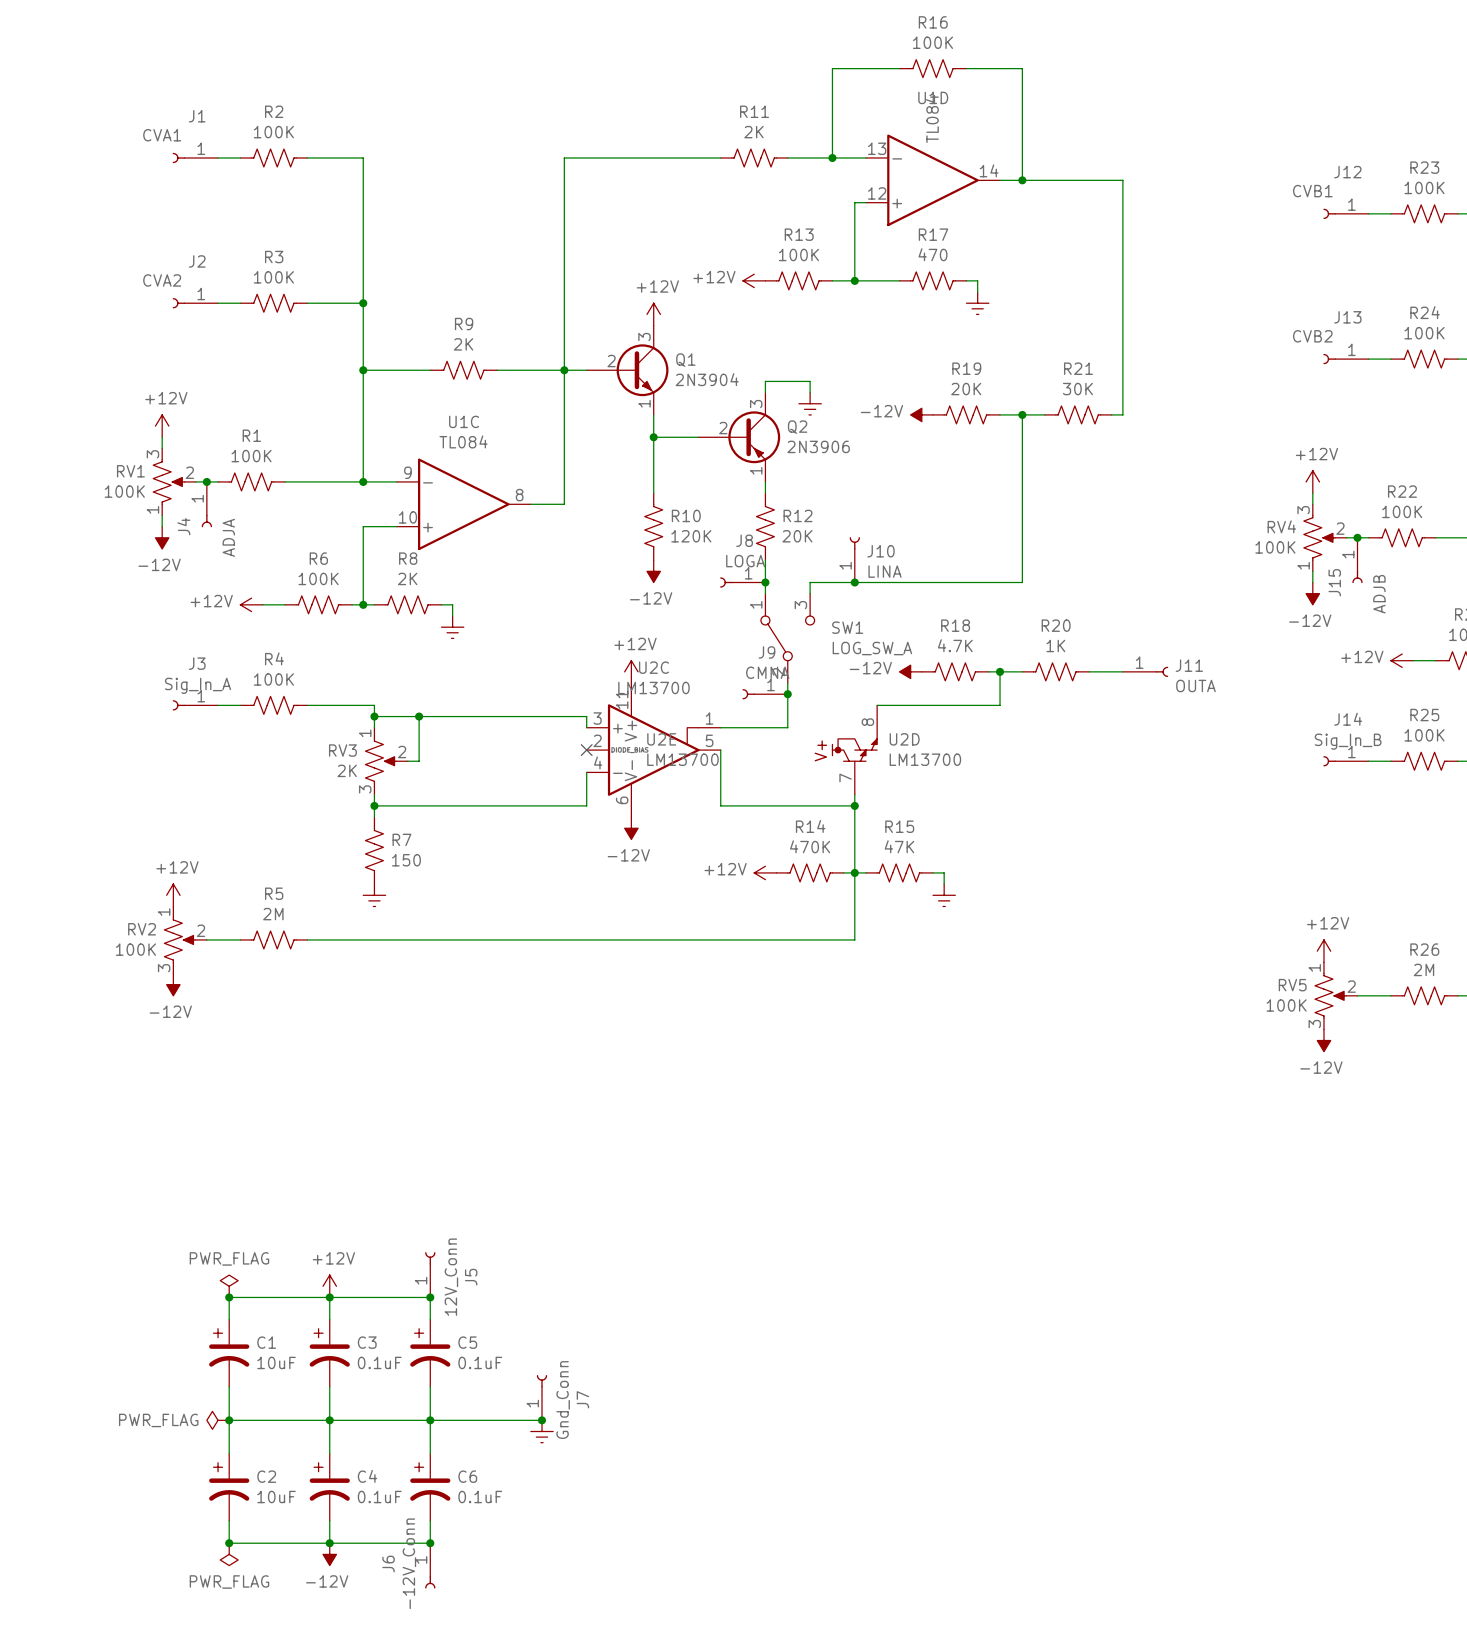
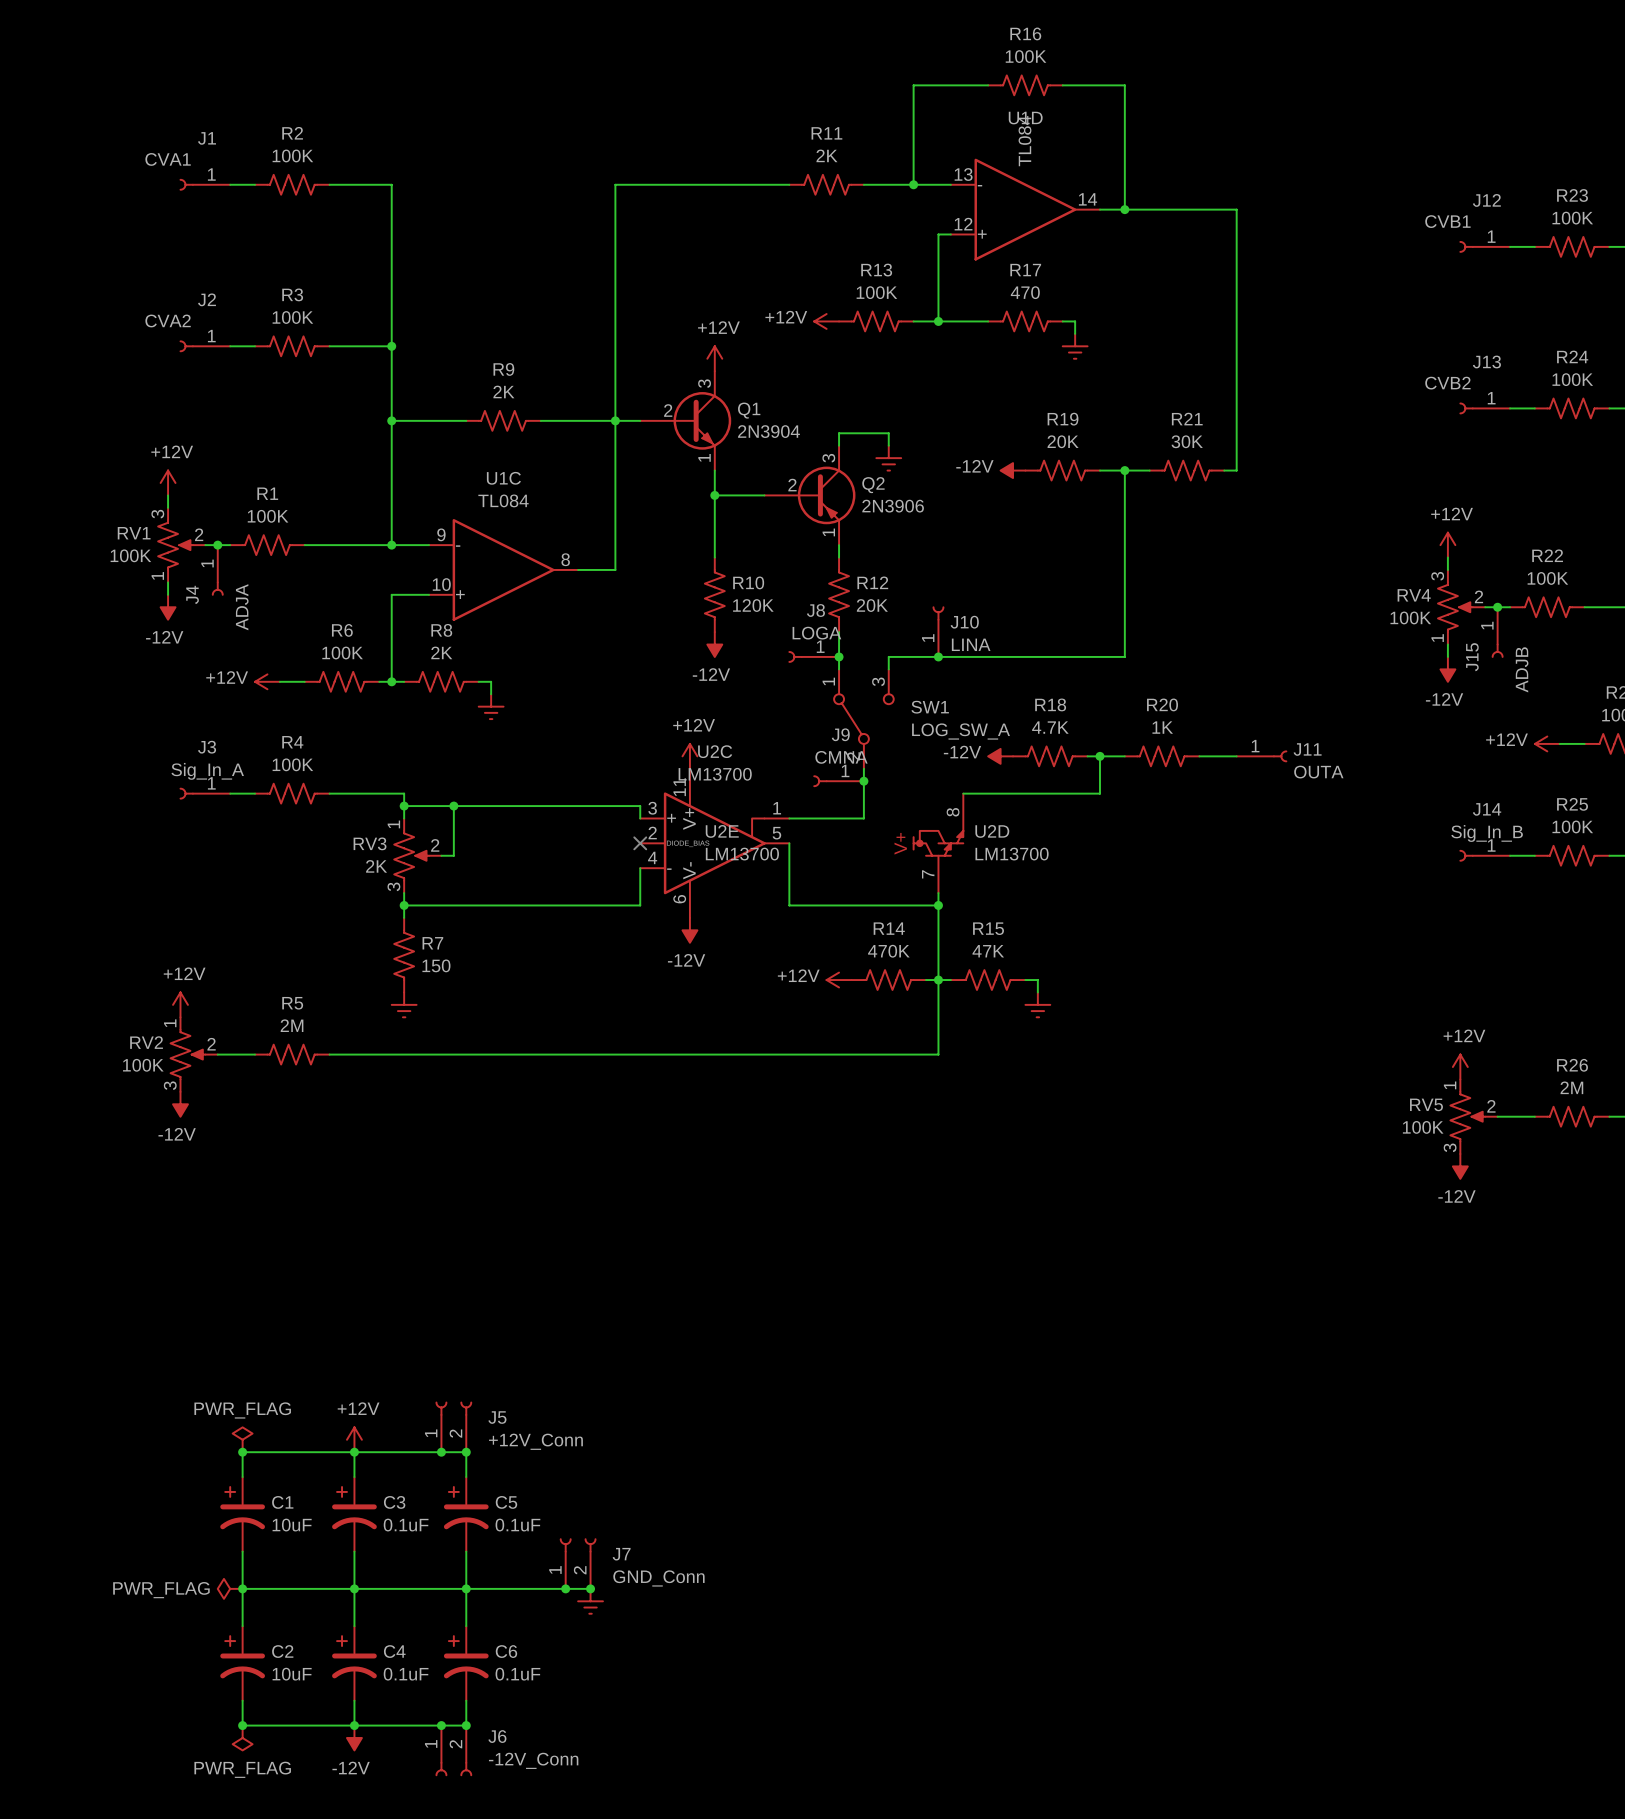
J5 symbol: [425, 1252, 436, 1298] -> [435, 1401, 473, 1453]
J5 value: 12V_Conn (451, 1277) -> +12V_Conn (535, 1441)
junction: none -> (441, 1452)
J7 symbol: [536, 1374, 548, 1421] -> [559, 1538, 597, 1589]
J7 value: Gnd_Conn (563, 1400) -> GND_Conn (658, 1578)
junction: none -> (565, 1588)
junction: none -> (441, 1725)
J6 symbol: [425, 1543, 436, 1589] -> [435, 1725, 473, 1777]
J6 value position: -12V_Conn (409, 1563) -> -12V_Conn (533, 1760)
J6 name position: J6 (388, 1564) -> J6 (497, 1736)

